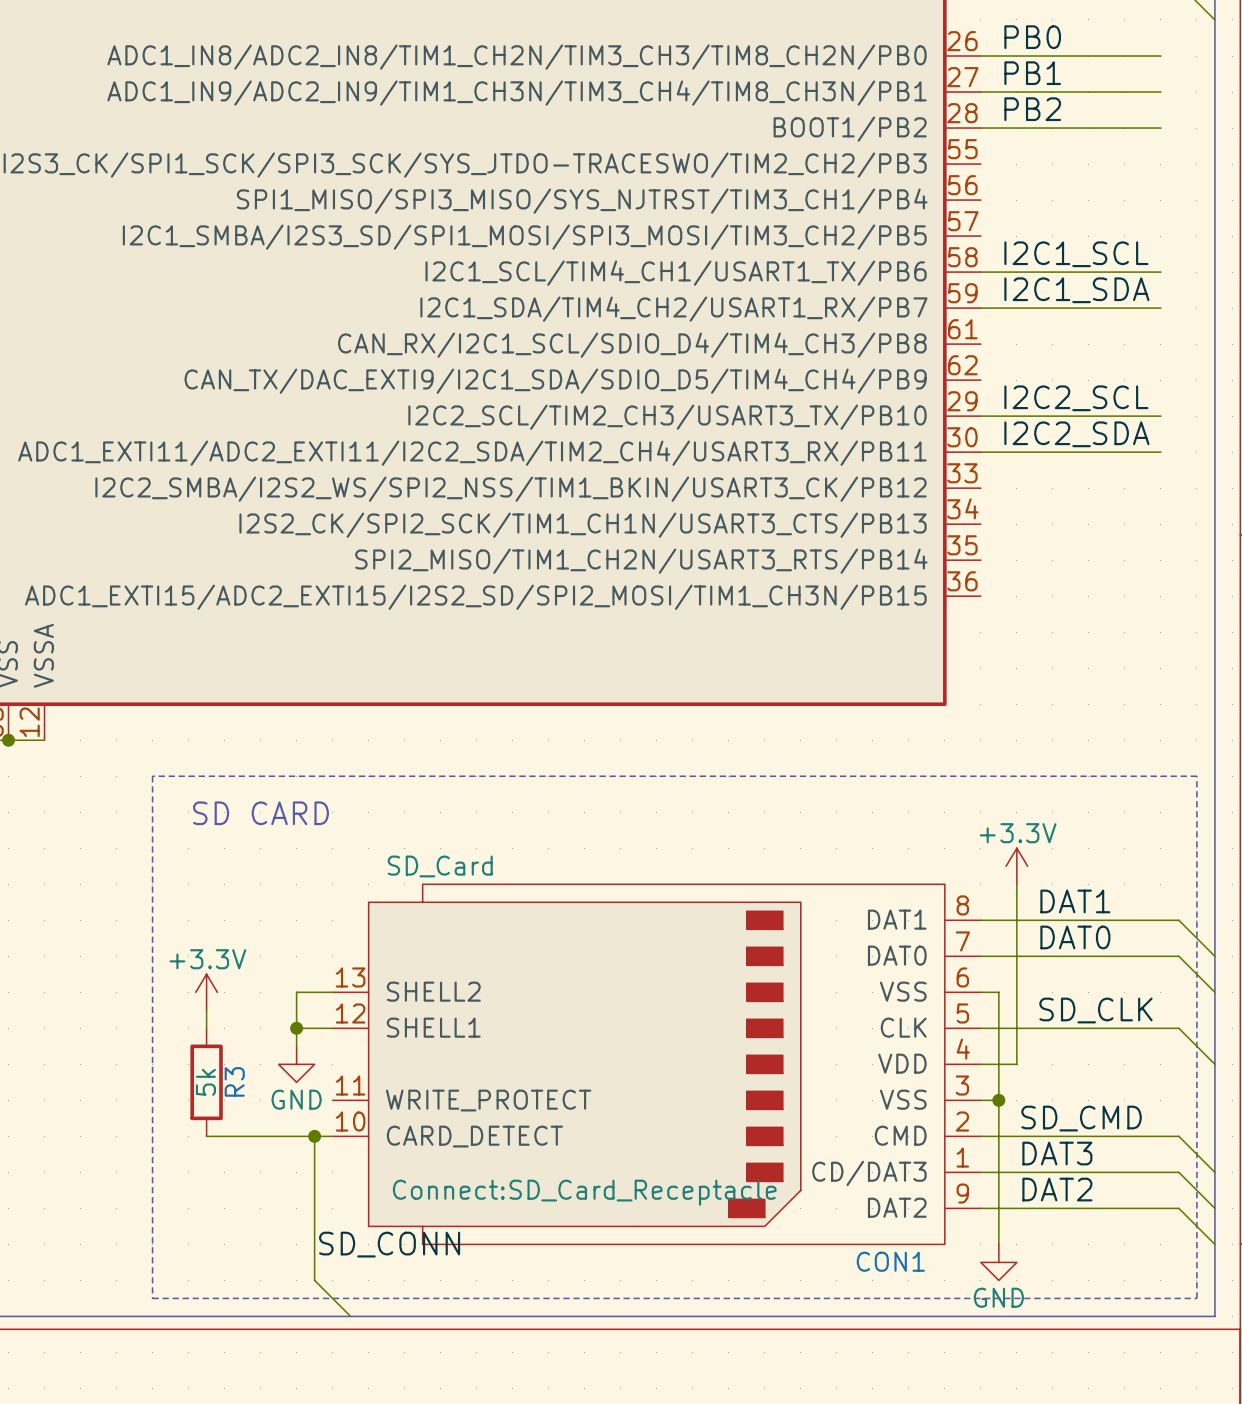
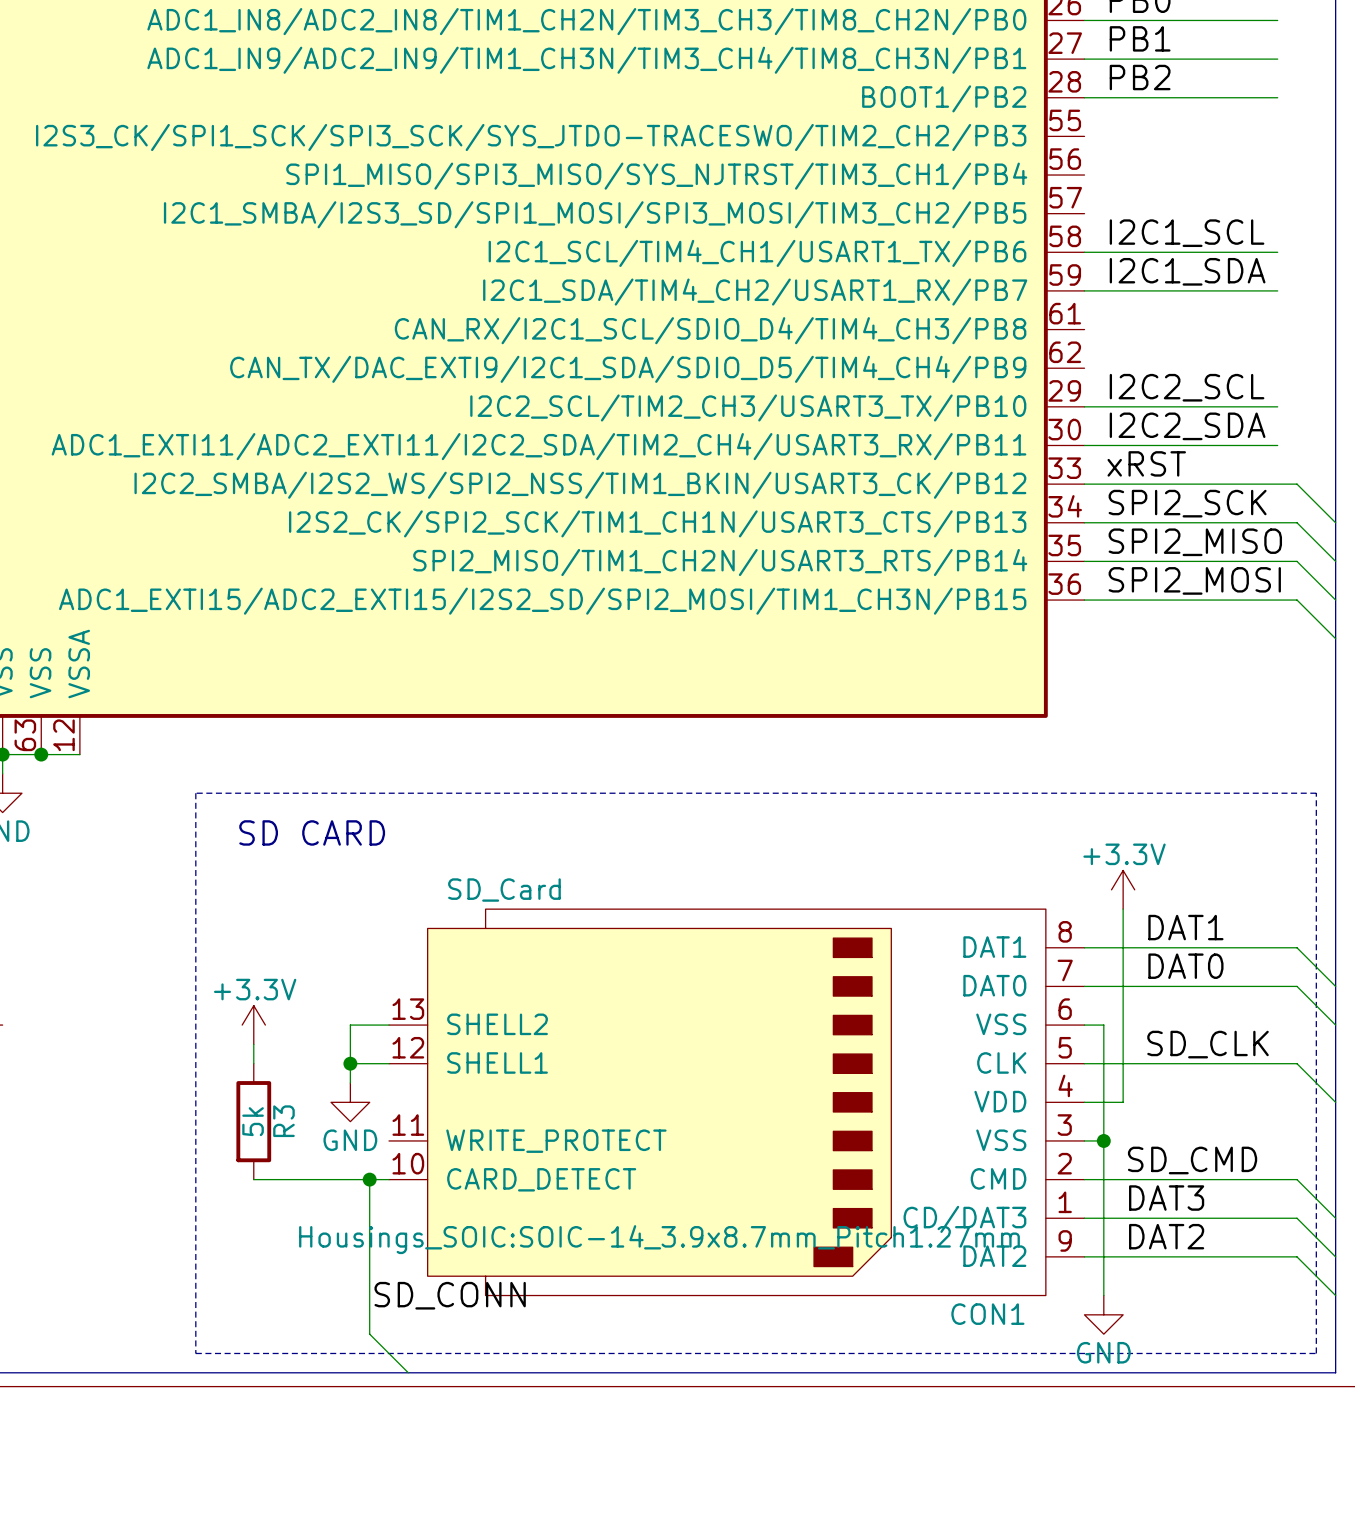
label: none -> xRST (1146, 463)
wire: none -> (1084, 484) (1297, 484) (1335, 522)
label: none -> SPI2_SCK (1187, 503)
wire: none -> (1084, 522) (1297, 522) (1335, 561)
label: none -> SPI2_MISO (1195, 542)
wire: none -> (1084, 561) (1297, 561) (1335, 600)
label: none -> SPI2_MOSI (1194, 580)
wire: none -> (1084, 600) (1297, 600) (1335, 638)
CON1 text: Connect:SD_Card_Receptacle (584, 1192) -> Housings_SOIC:SOIC-14_3.9x8.7mm_Pitch1.27mm (659, 1239)

